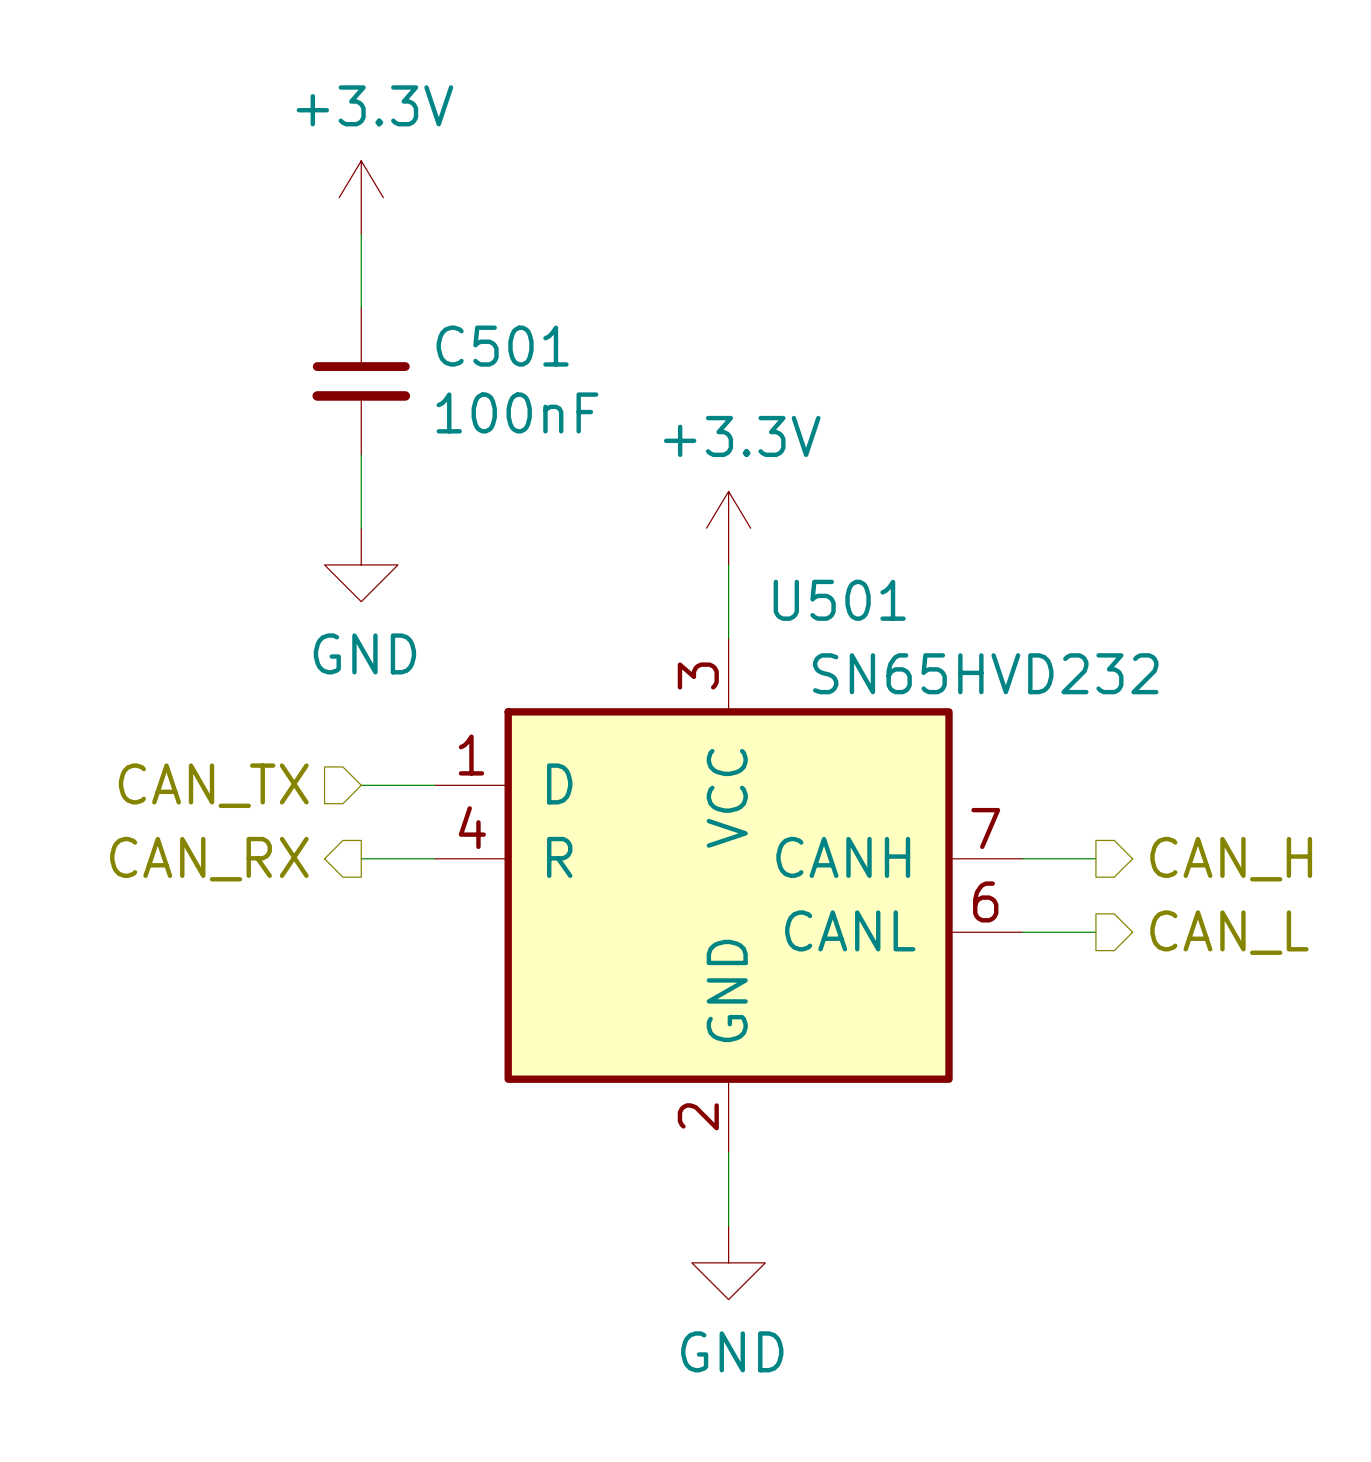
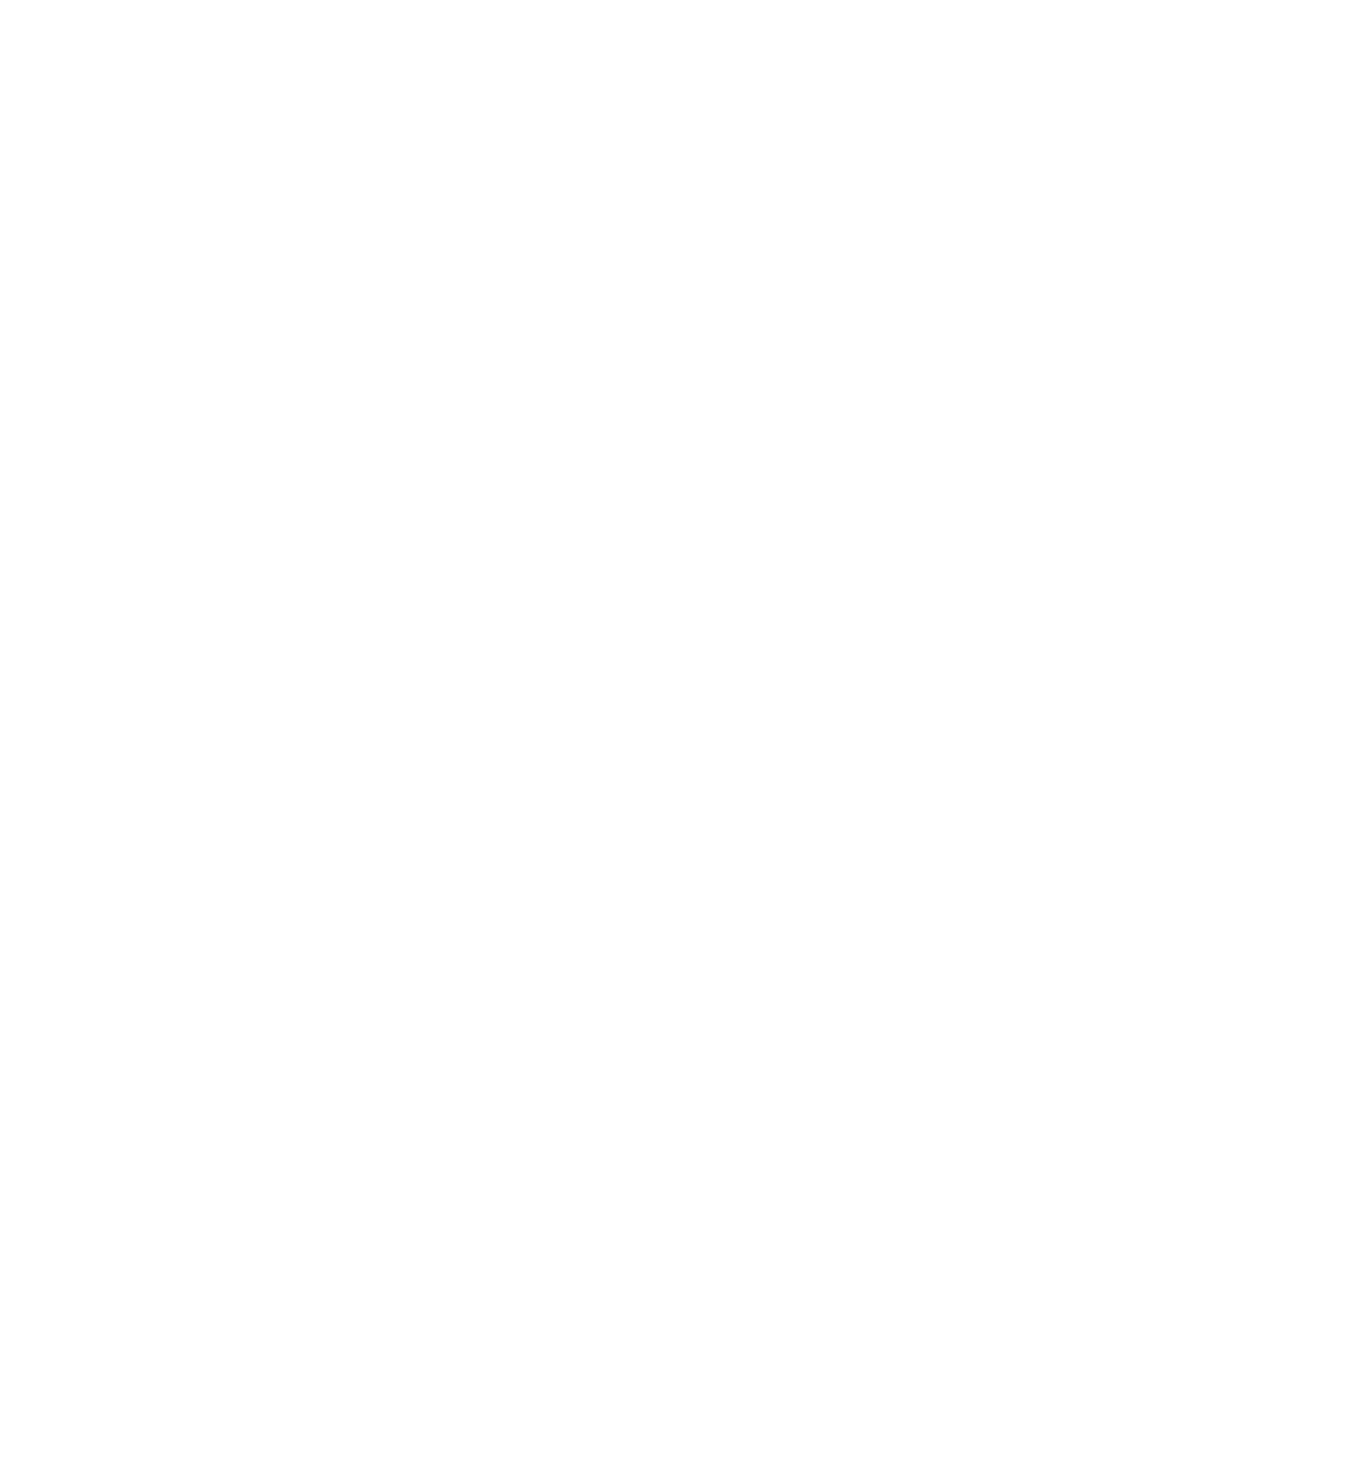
power symbol: +3.3V (361, 197) -> none
wire: (361, 234) (361, 307) -> none
C501: 100nF (361, 381) -> none
wire: (361, 454) (361, 528) -> none
power symbol: +3.3V (728, 528) -> none
power symbol: GND (361, 564) -> none
wire: (728, 564) (728, 638) -> none
hierarchical label: CAN_TX (213, 785) -> none
wire: (361, 785) (434, 785) -> none
wire: (361, 858) (434, 858) -> none
wire: (1022, 858) (1095, 858) -> none
hierarchical label: CAN_RX (209, 859) -> none
hierarchical label: CAN_H (1231, 859) -> none
U501: SN65HVD232 (728, 895) -> none
wire: (1022, 932) (1095, 932) -> none
hierarchical label: CAN_L (1229, 932) -> none
wire: (728, 1152) (728, 1226) -> none
power symbol: GND (728, 1262) -> none

